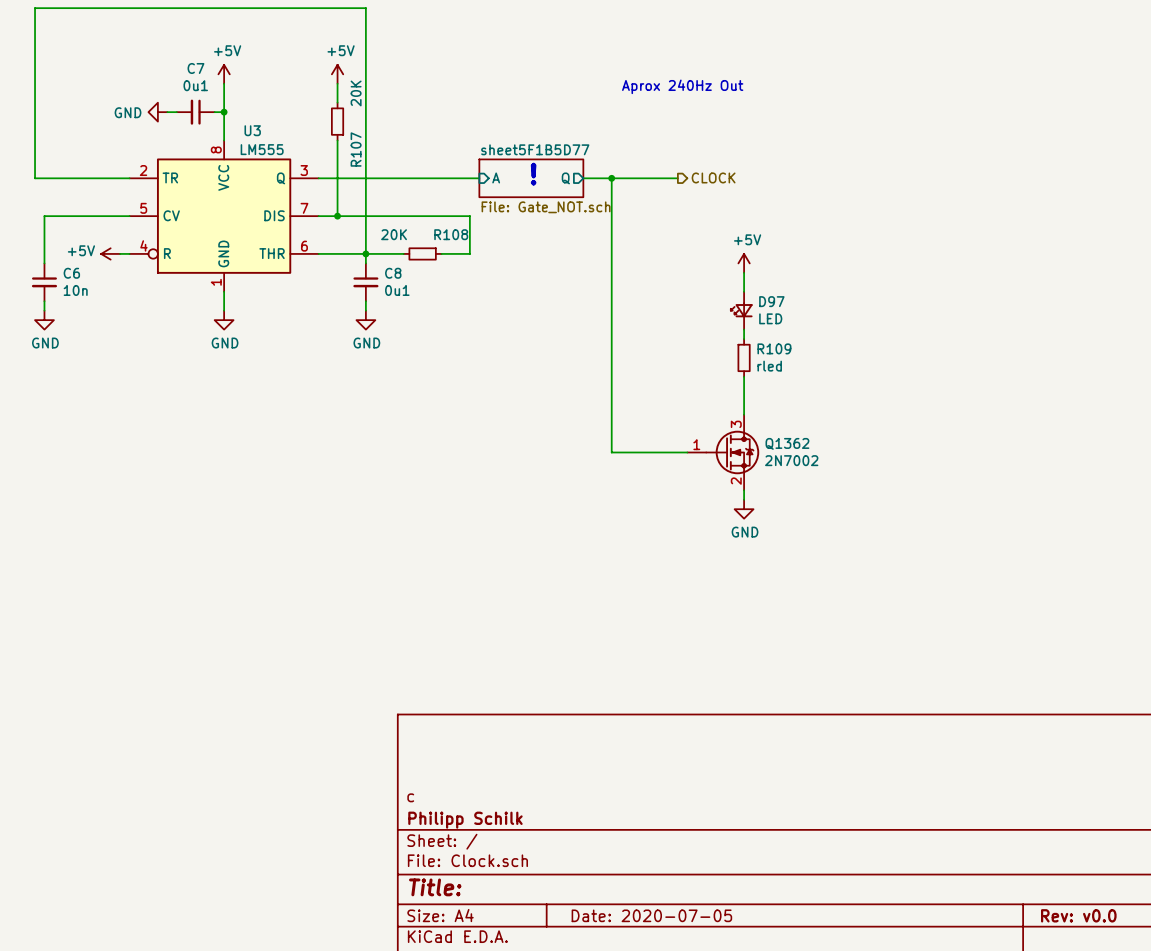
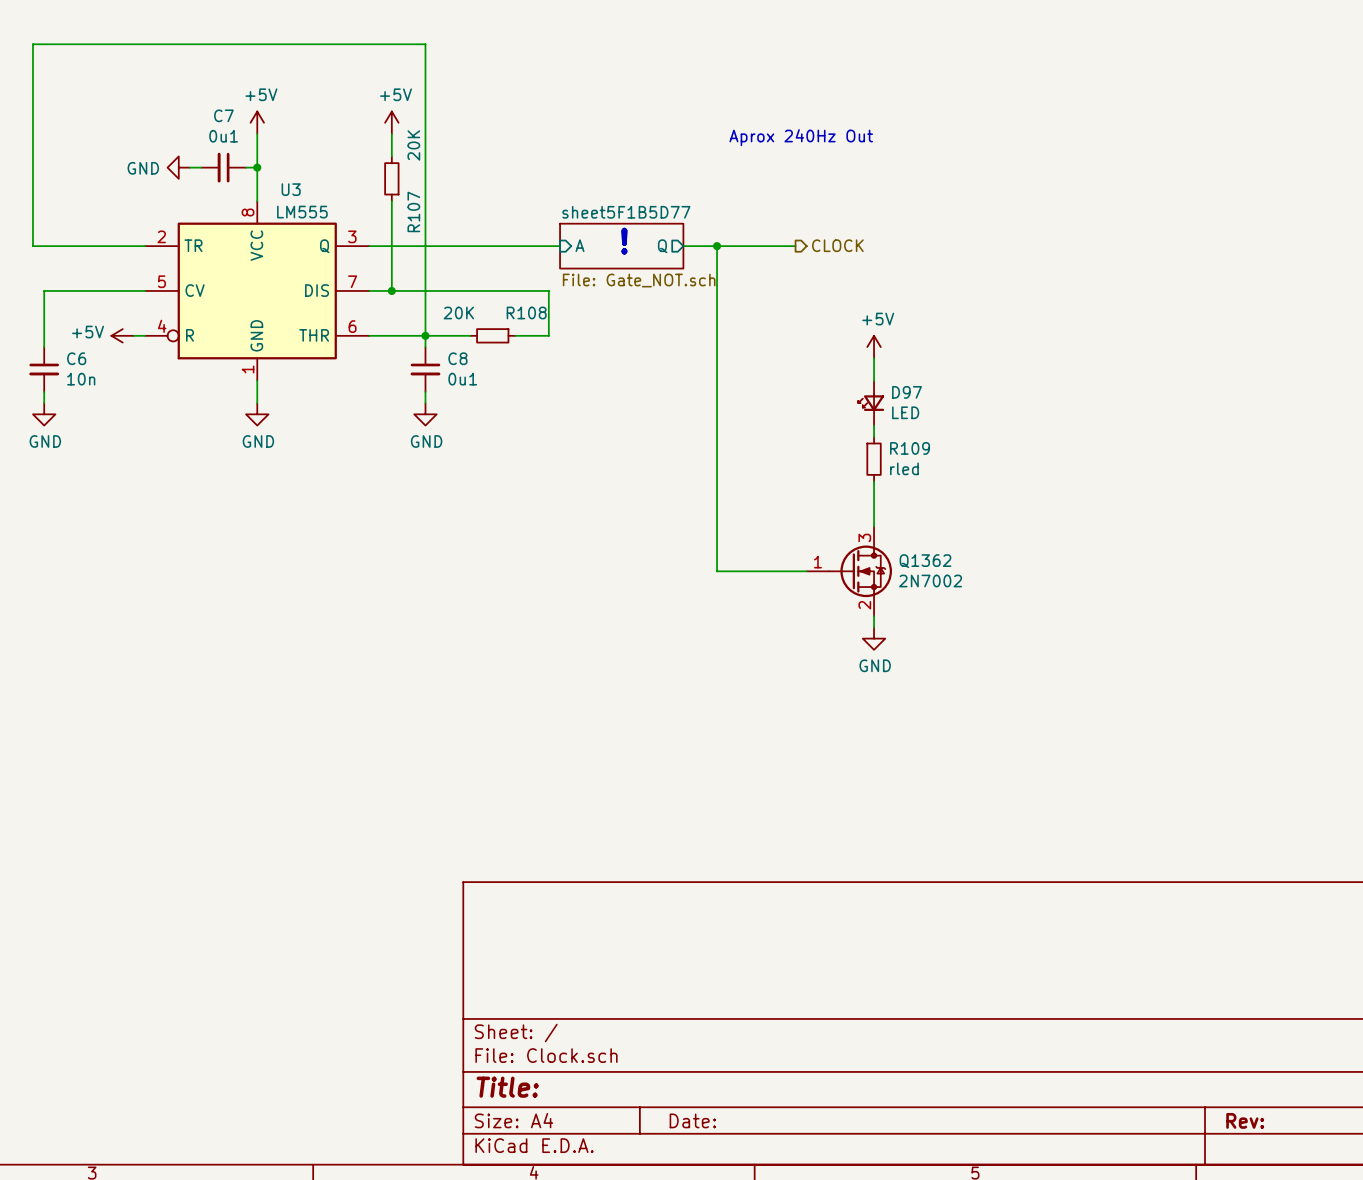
title block: c (410, 797) -> none
title block: Philipp Schilk (465, 820) -> none
title block: Date: 2020-07-05 (651, 915) -> Date: (692, 1120)
title block: Rev: v0.0 (1078, 915) -> Rev: (1245, 1120)

